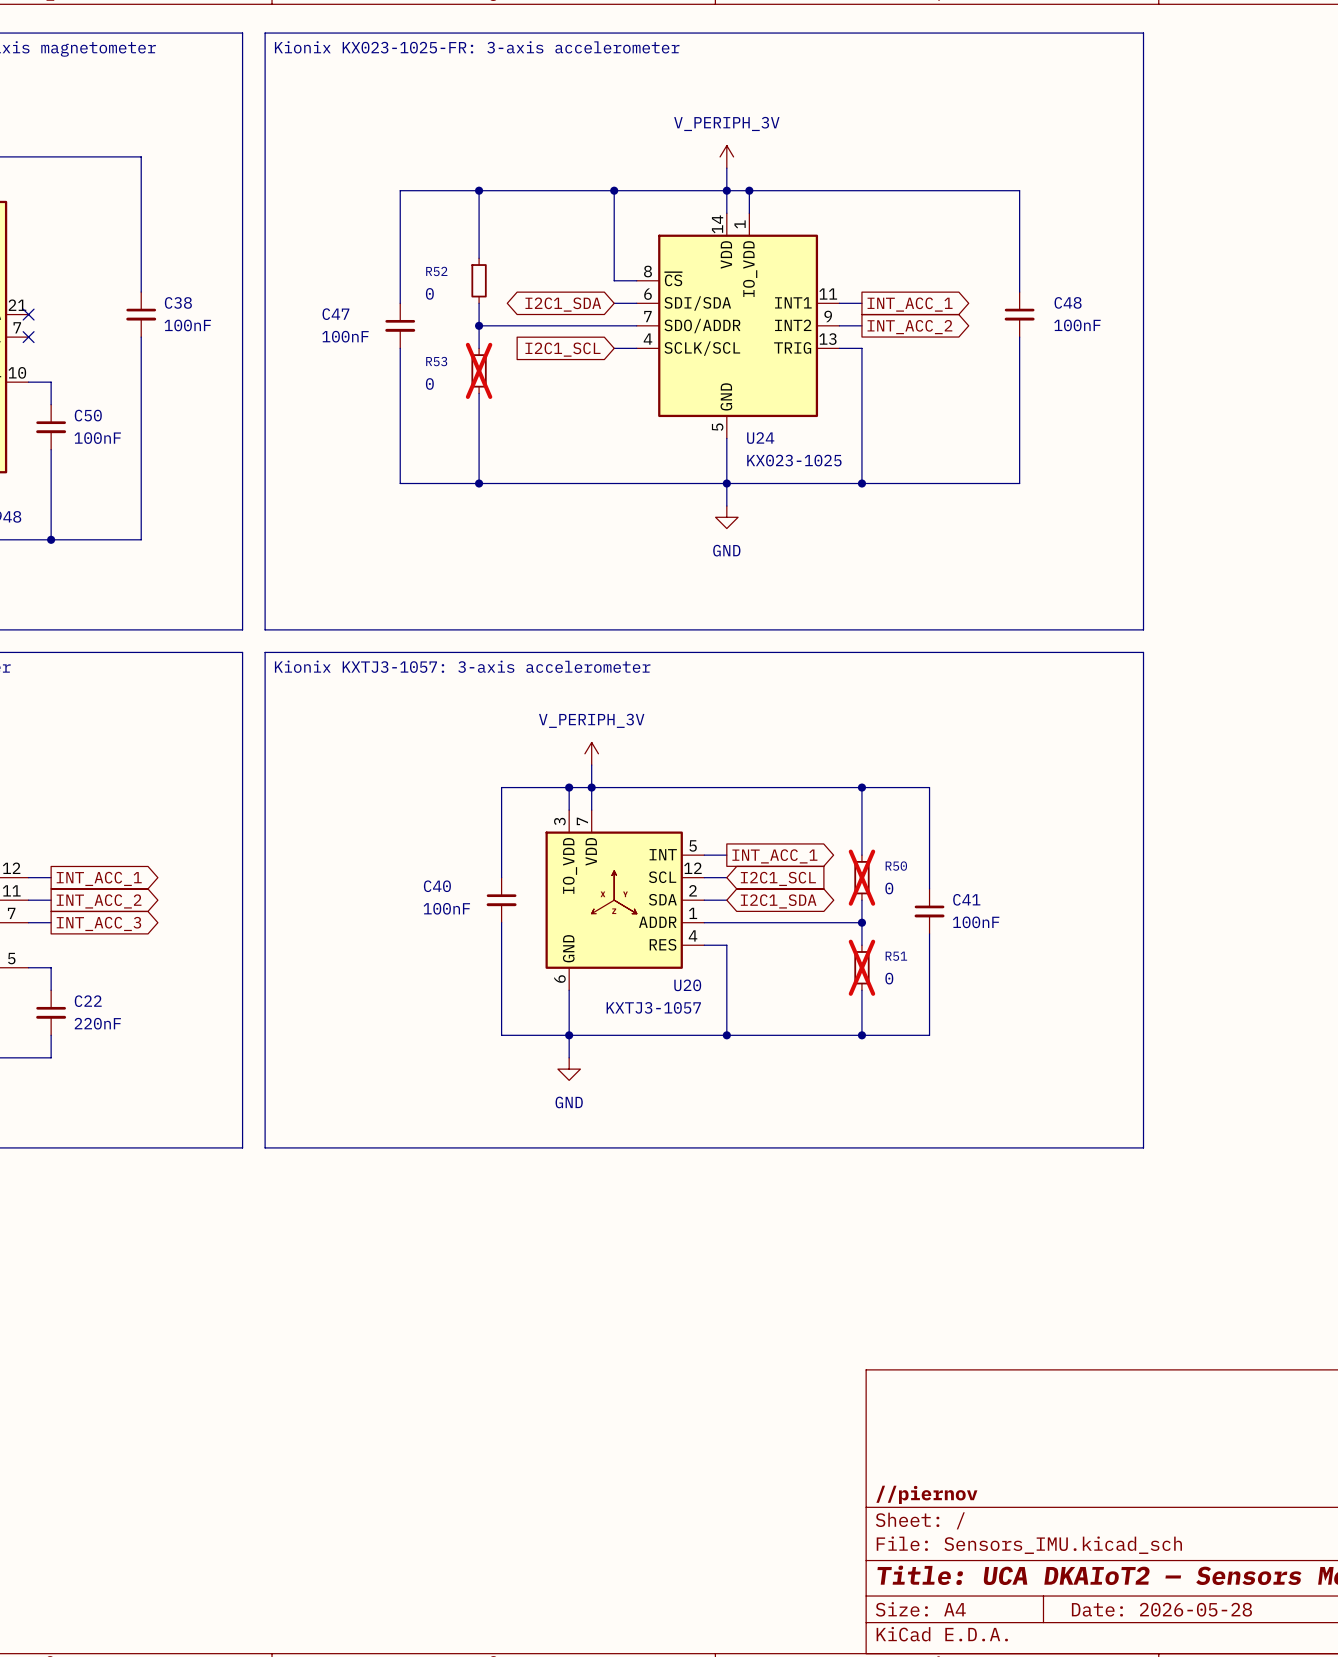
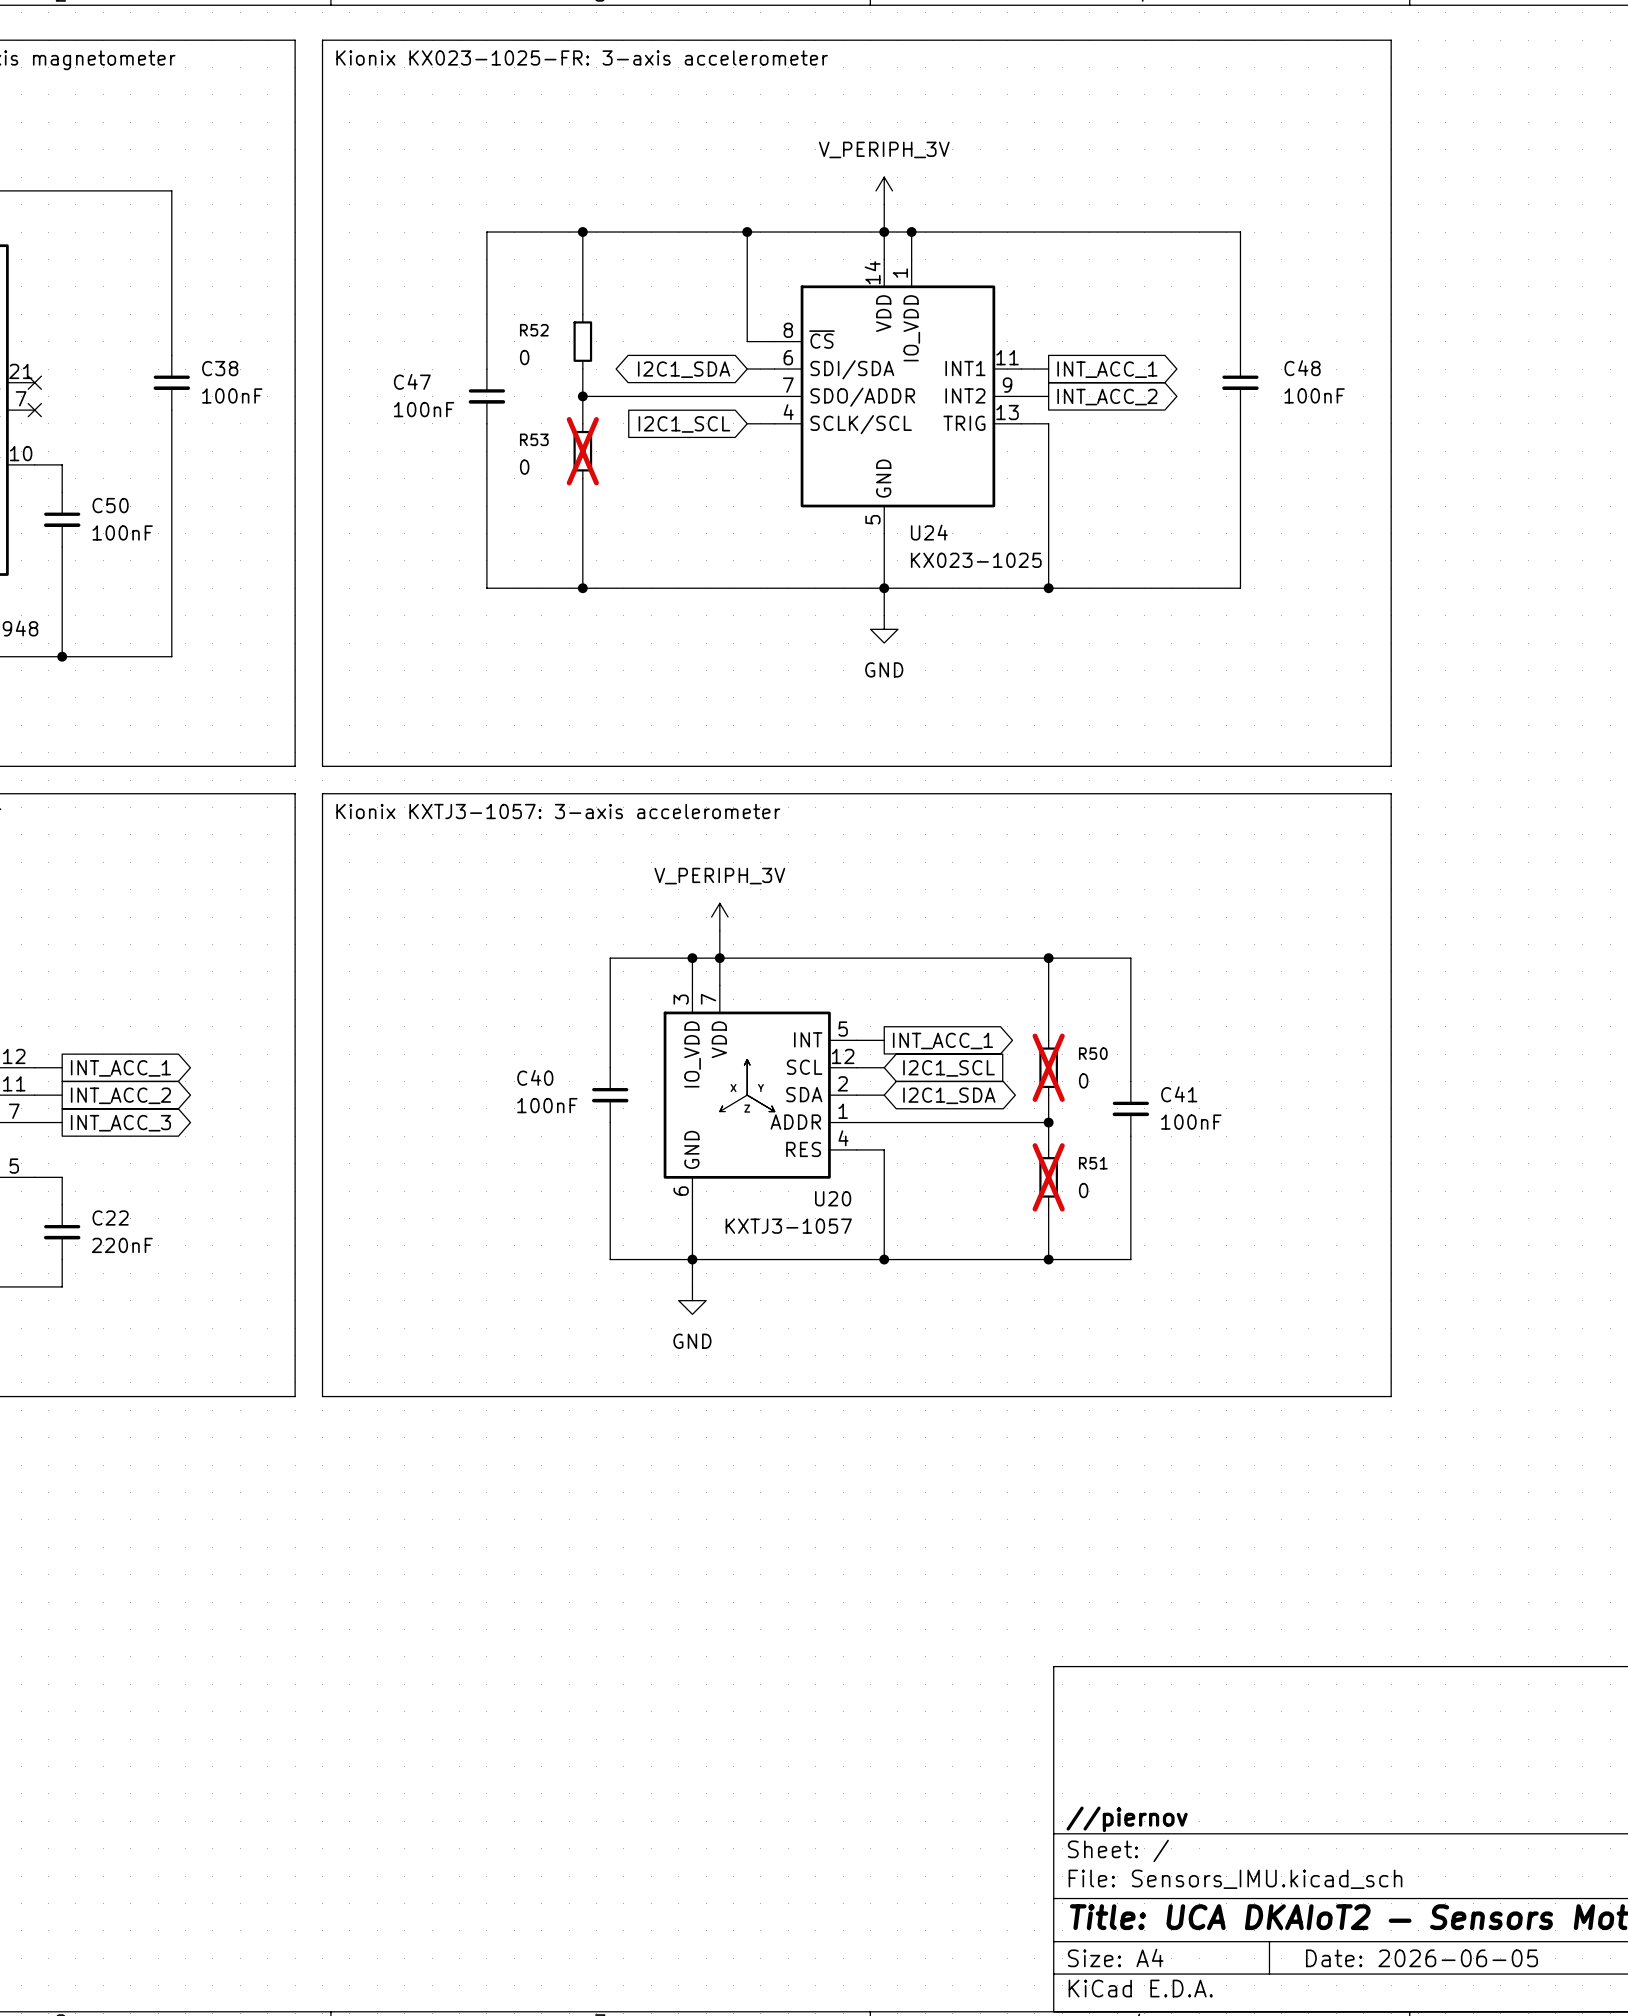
title block: Date: 2026-05-28 (1161, 1609) -> Date: 2026-06-05 (1421, 1958)

